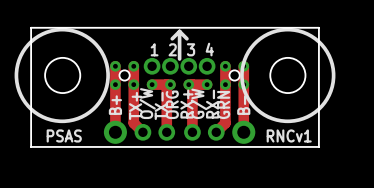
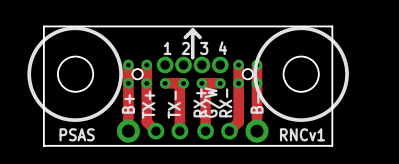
text: O/W (147, 103) -> none
text: ORG (172, 104) -> none
text: GRN (223, 105) -> none

